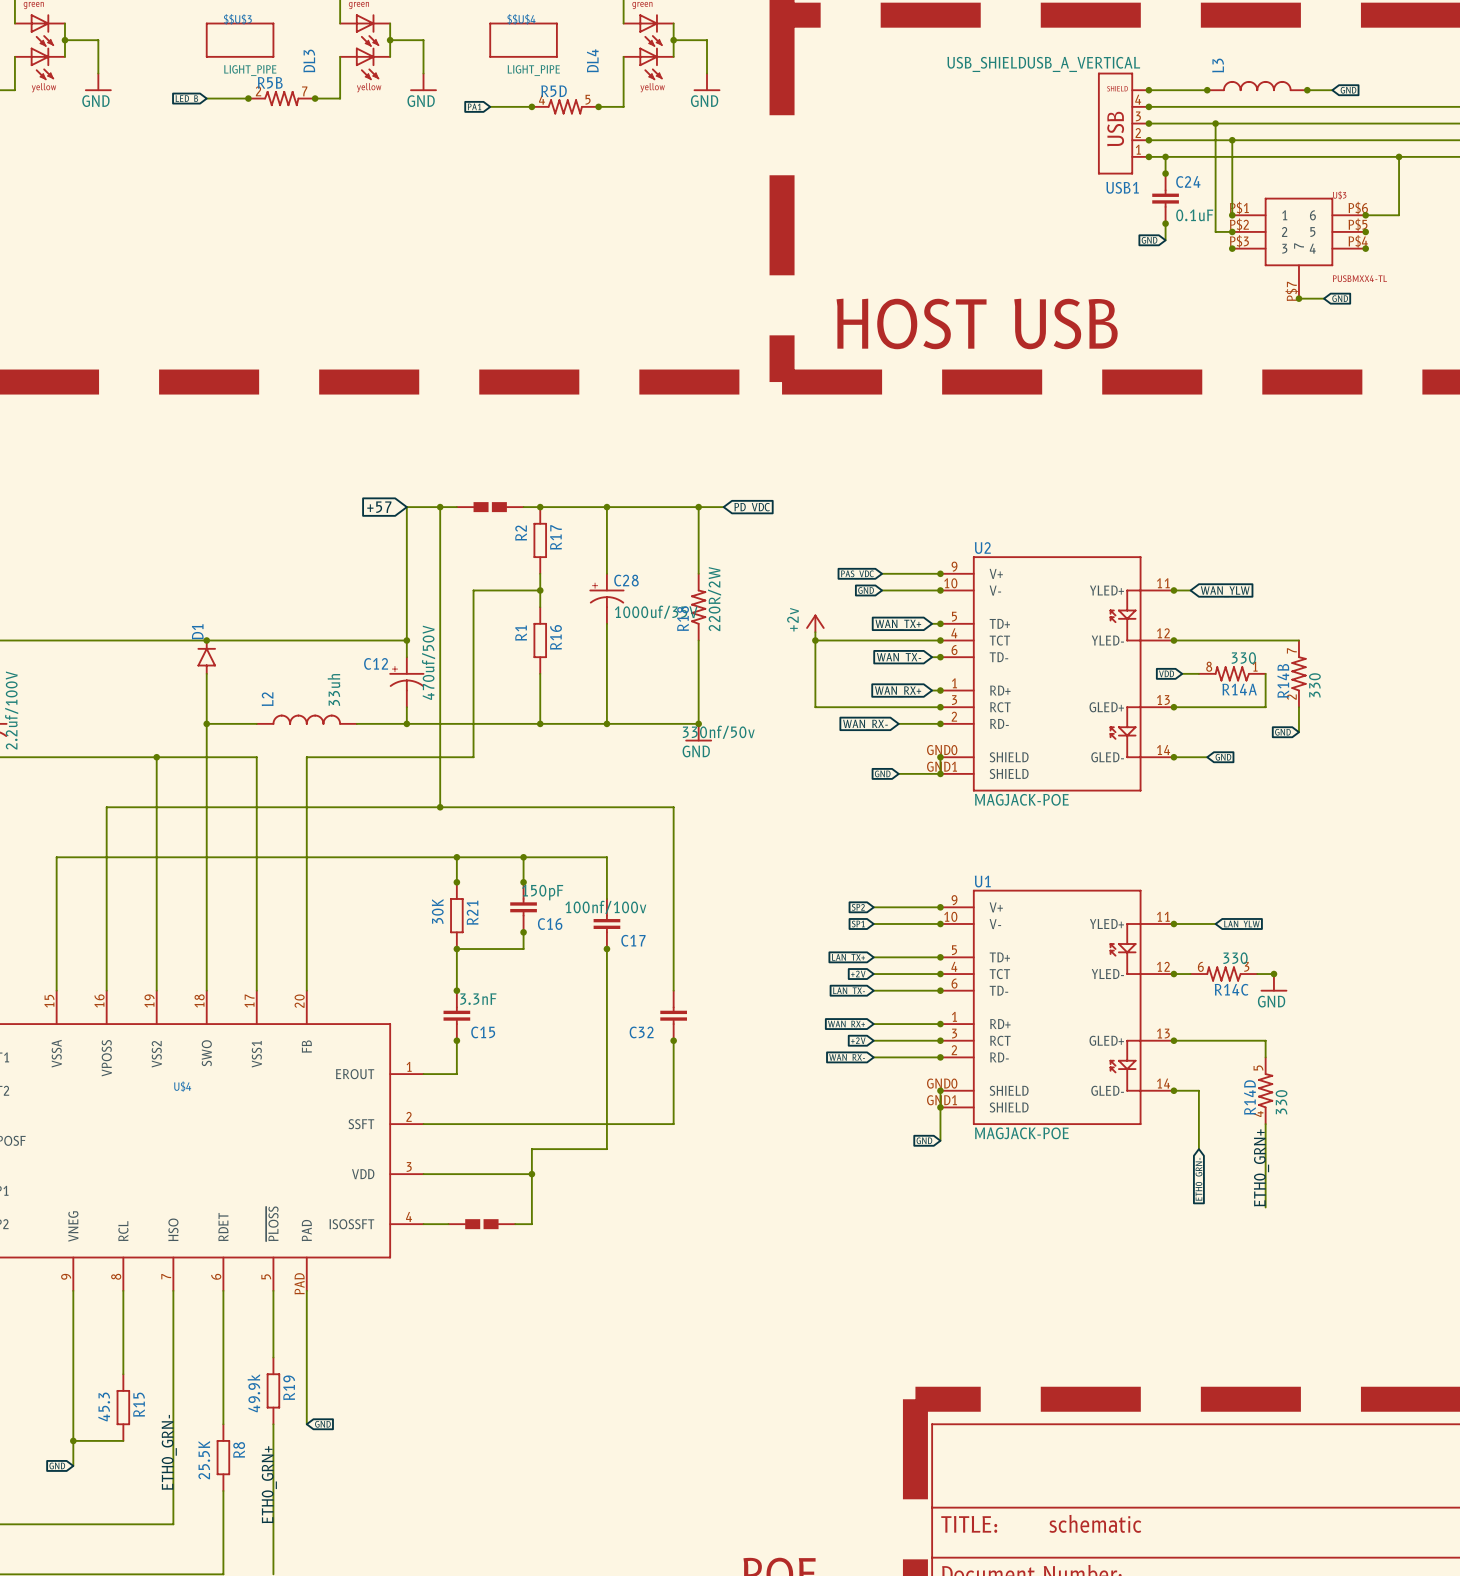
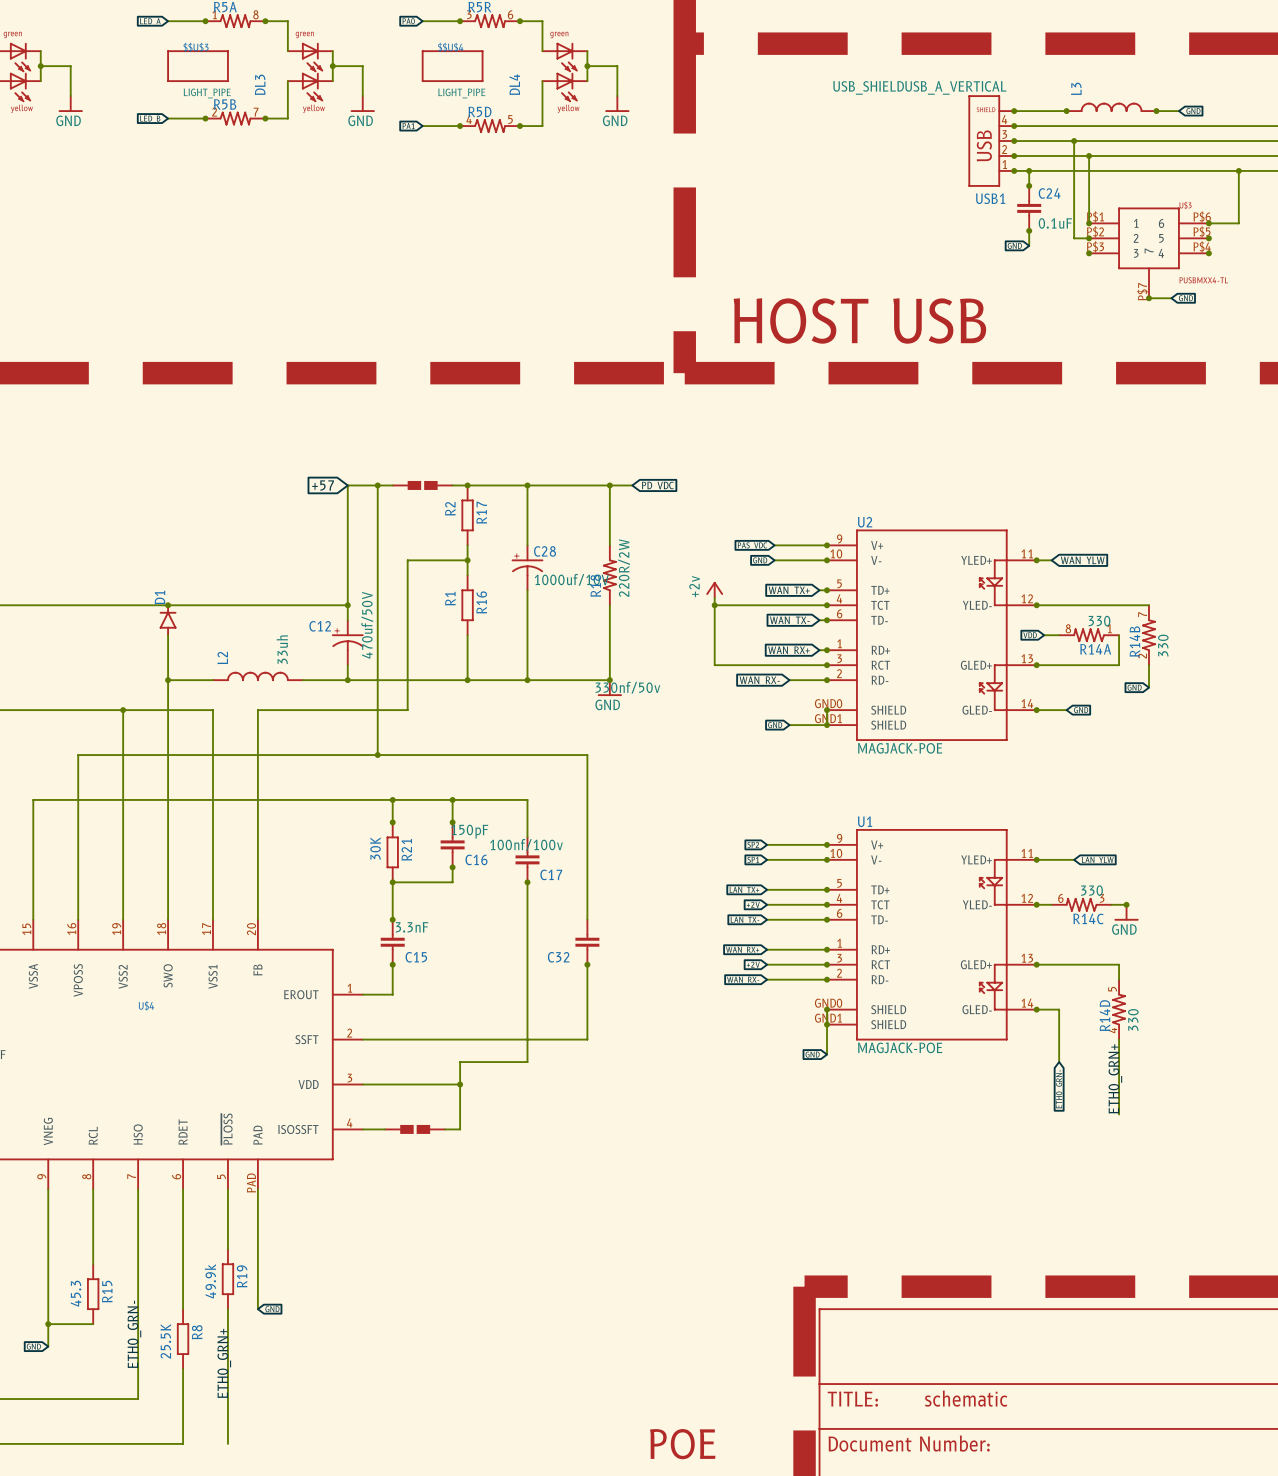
C28 value: 1000uf/35V (656, 612) -> 1000uf/10V (571, 579)

